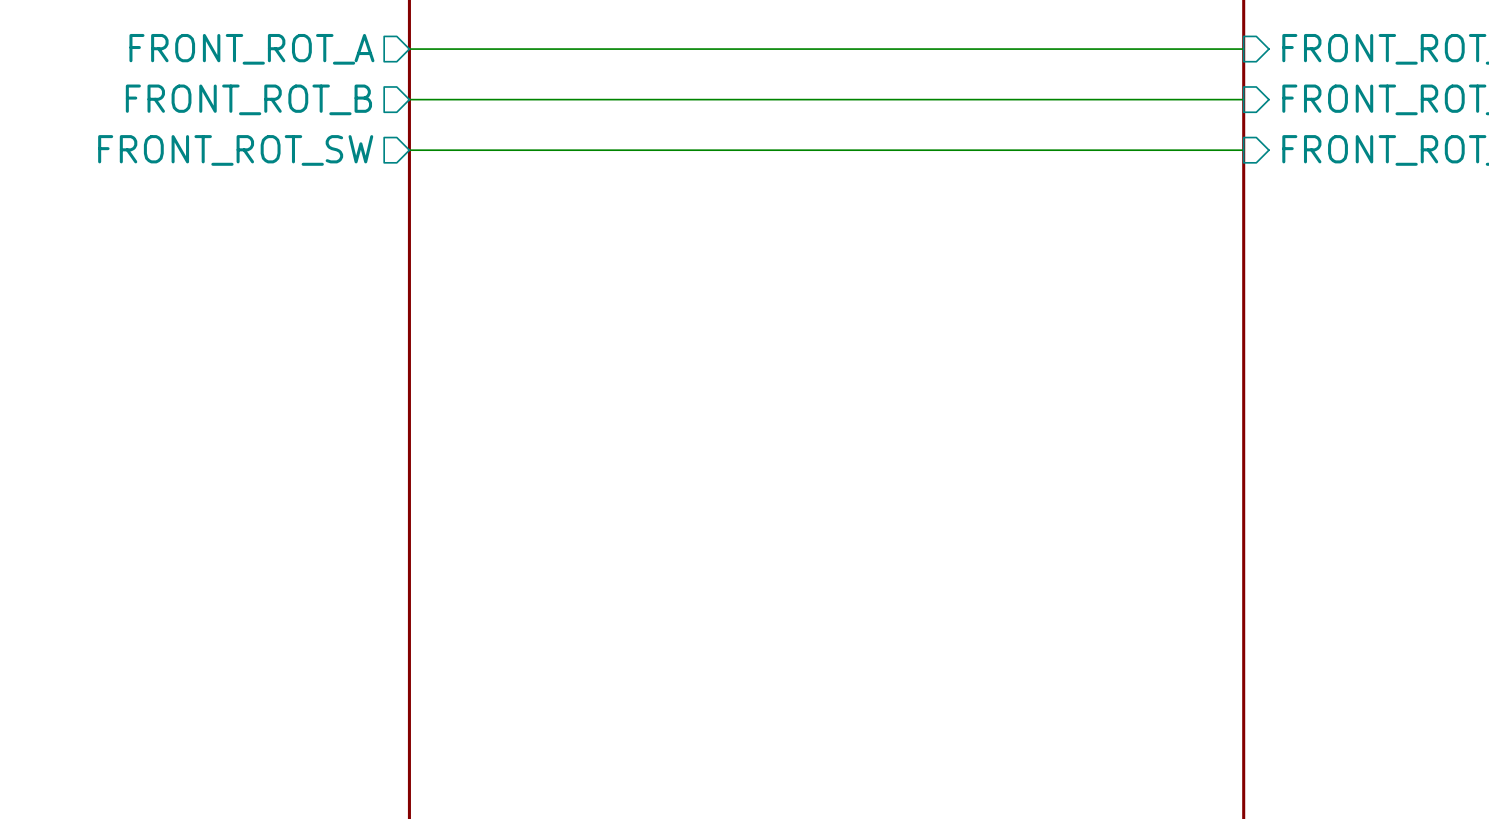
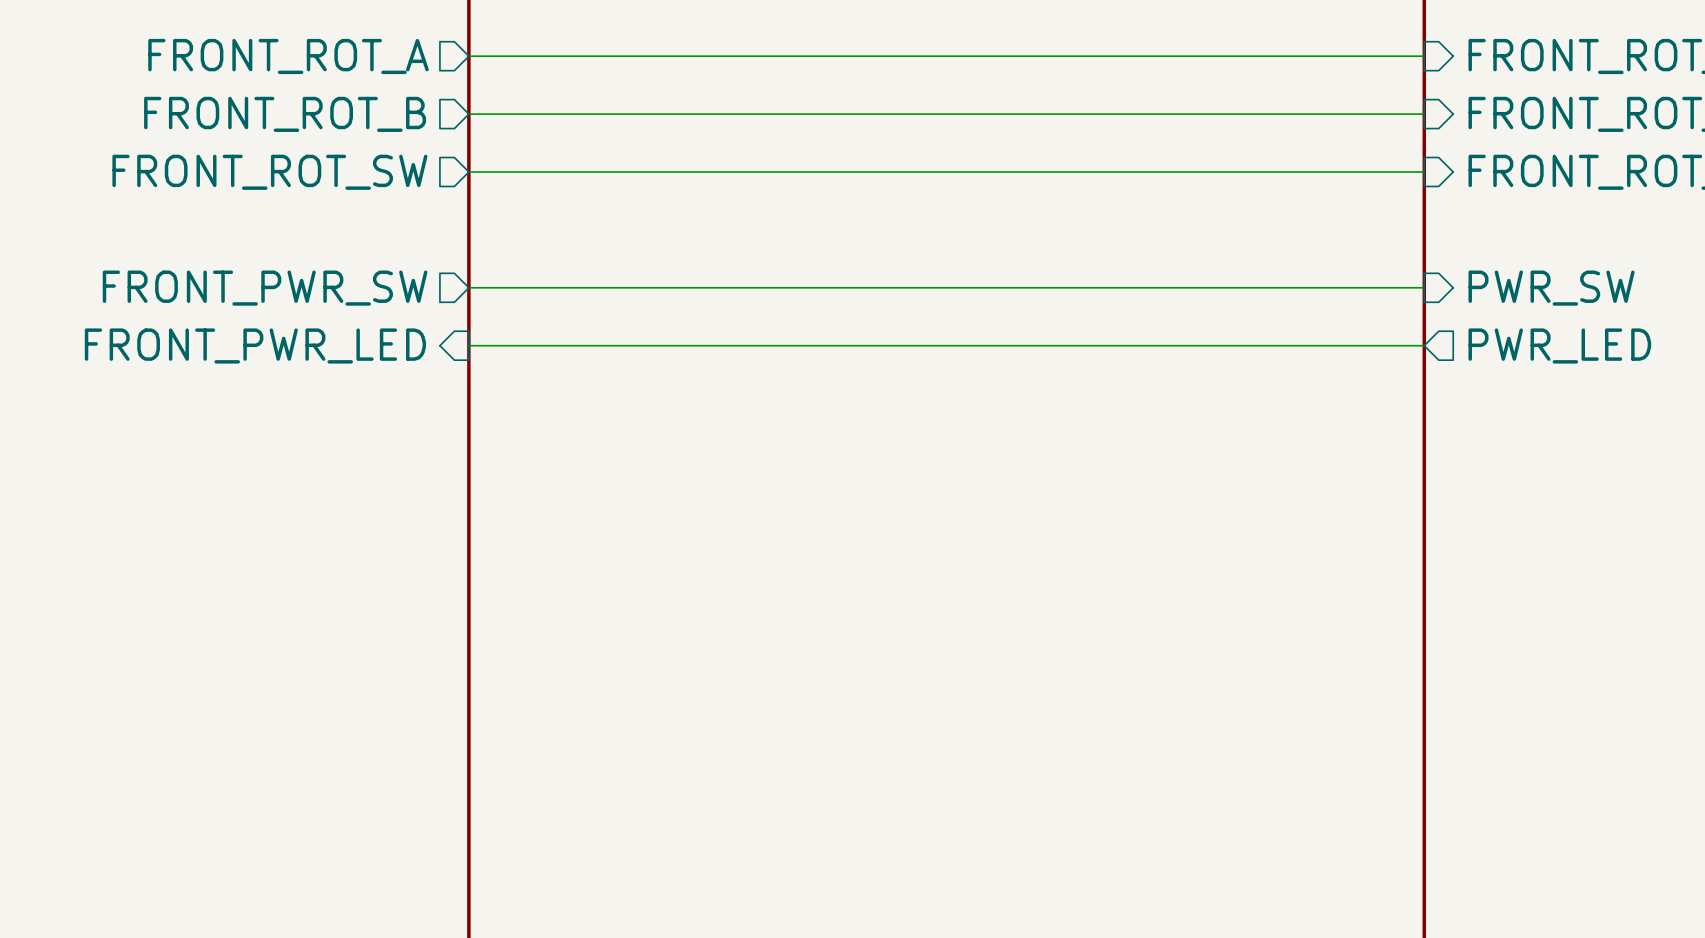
sheet pin: none -> FRONT_PWR_SW (265, 288)
wire: none -> (468, 287) (1424, 287)
sheet pin: none -> PWR_SW (1551, 288)
wire: none -> (468, 345) (1424, 345)
sheet pin: none -> FRONT_PWR_LED (255, 345)
sheet pin: none -> PWR_LED (1559, 345)

